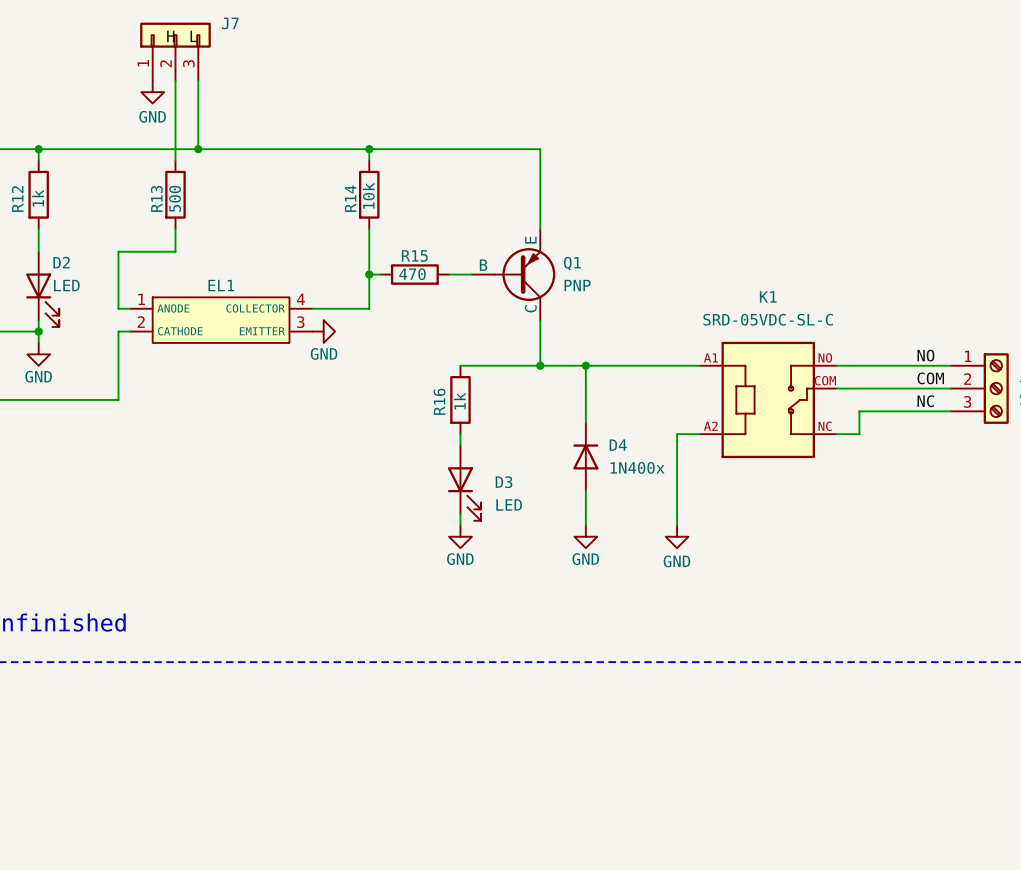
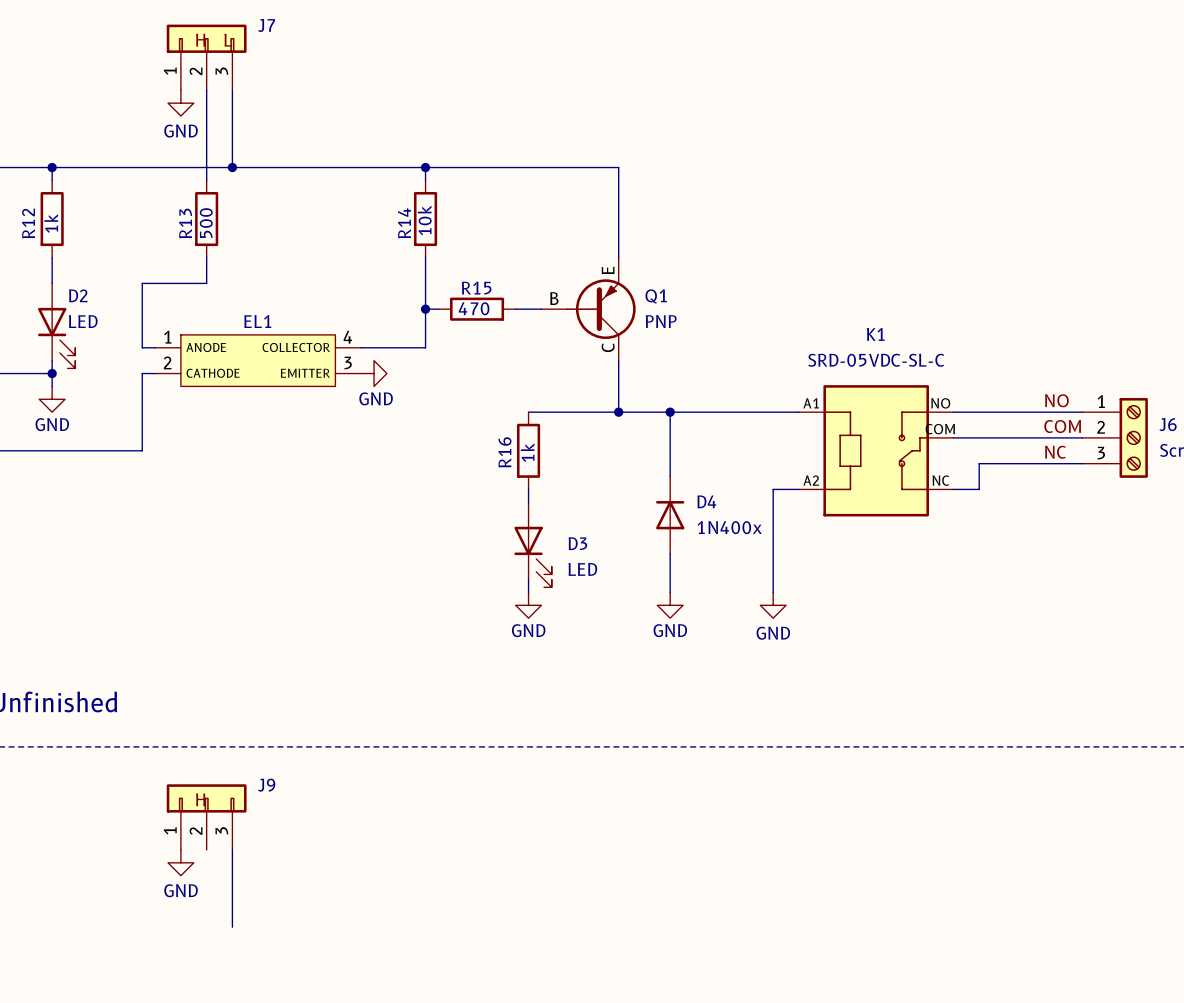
label: none -> H (200, 799)
J9: none -> (206, 817)
wire: none -> (232, 849) (232, 927)
power symbol: none -> GND (180, 862)

